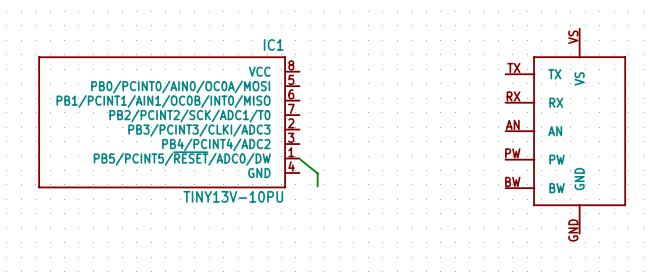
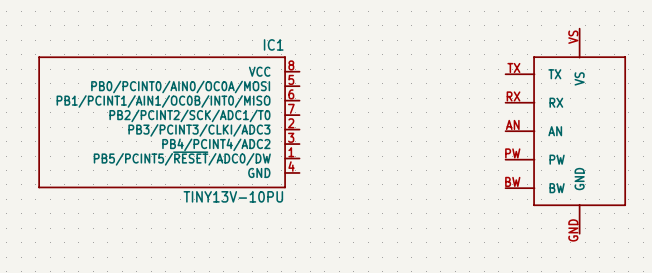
wire: (300, 159) (317, 173) (317, 186) -> none

